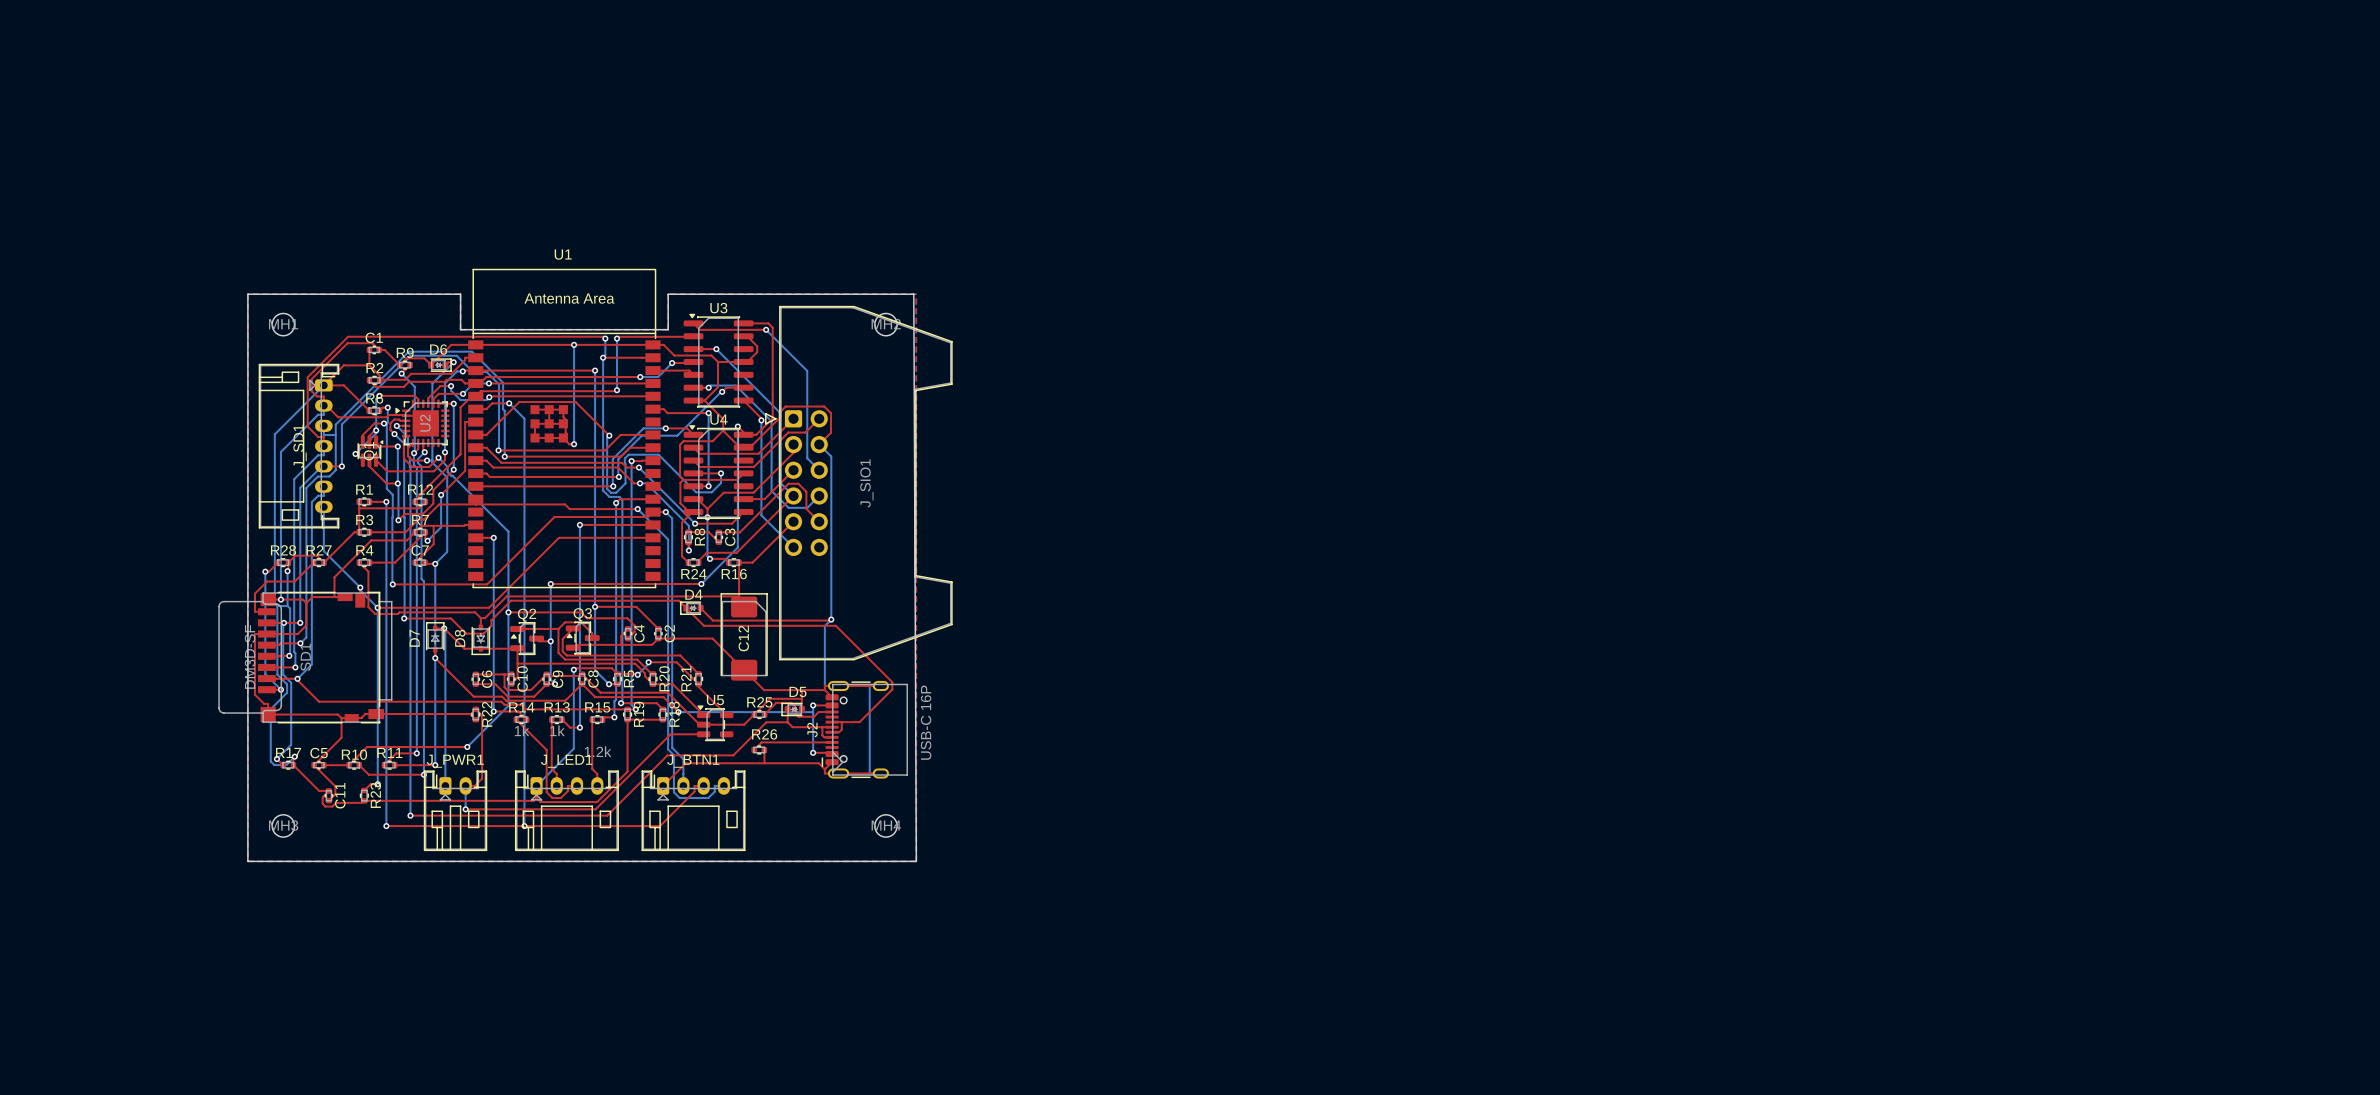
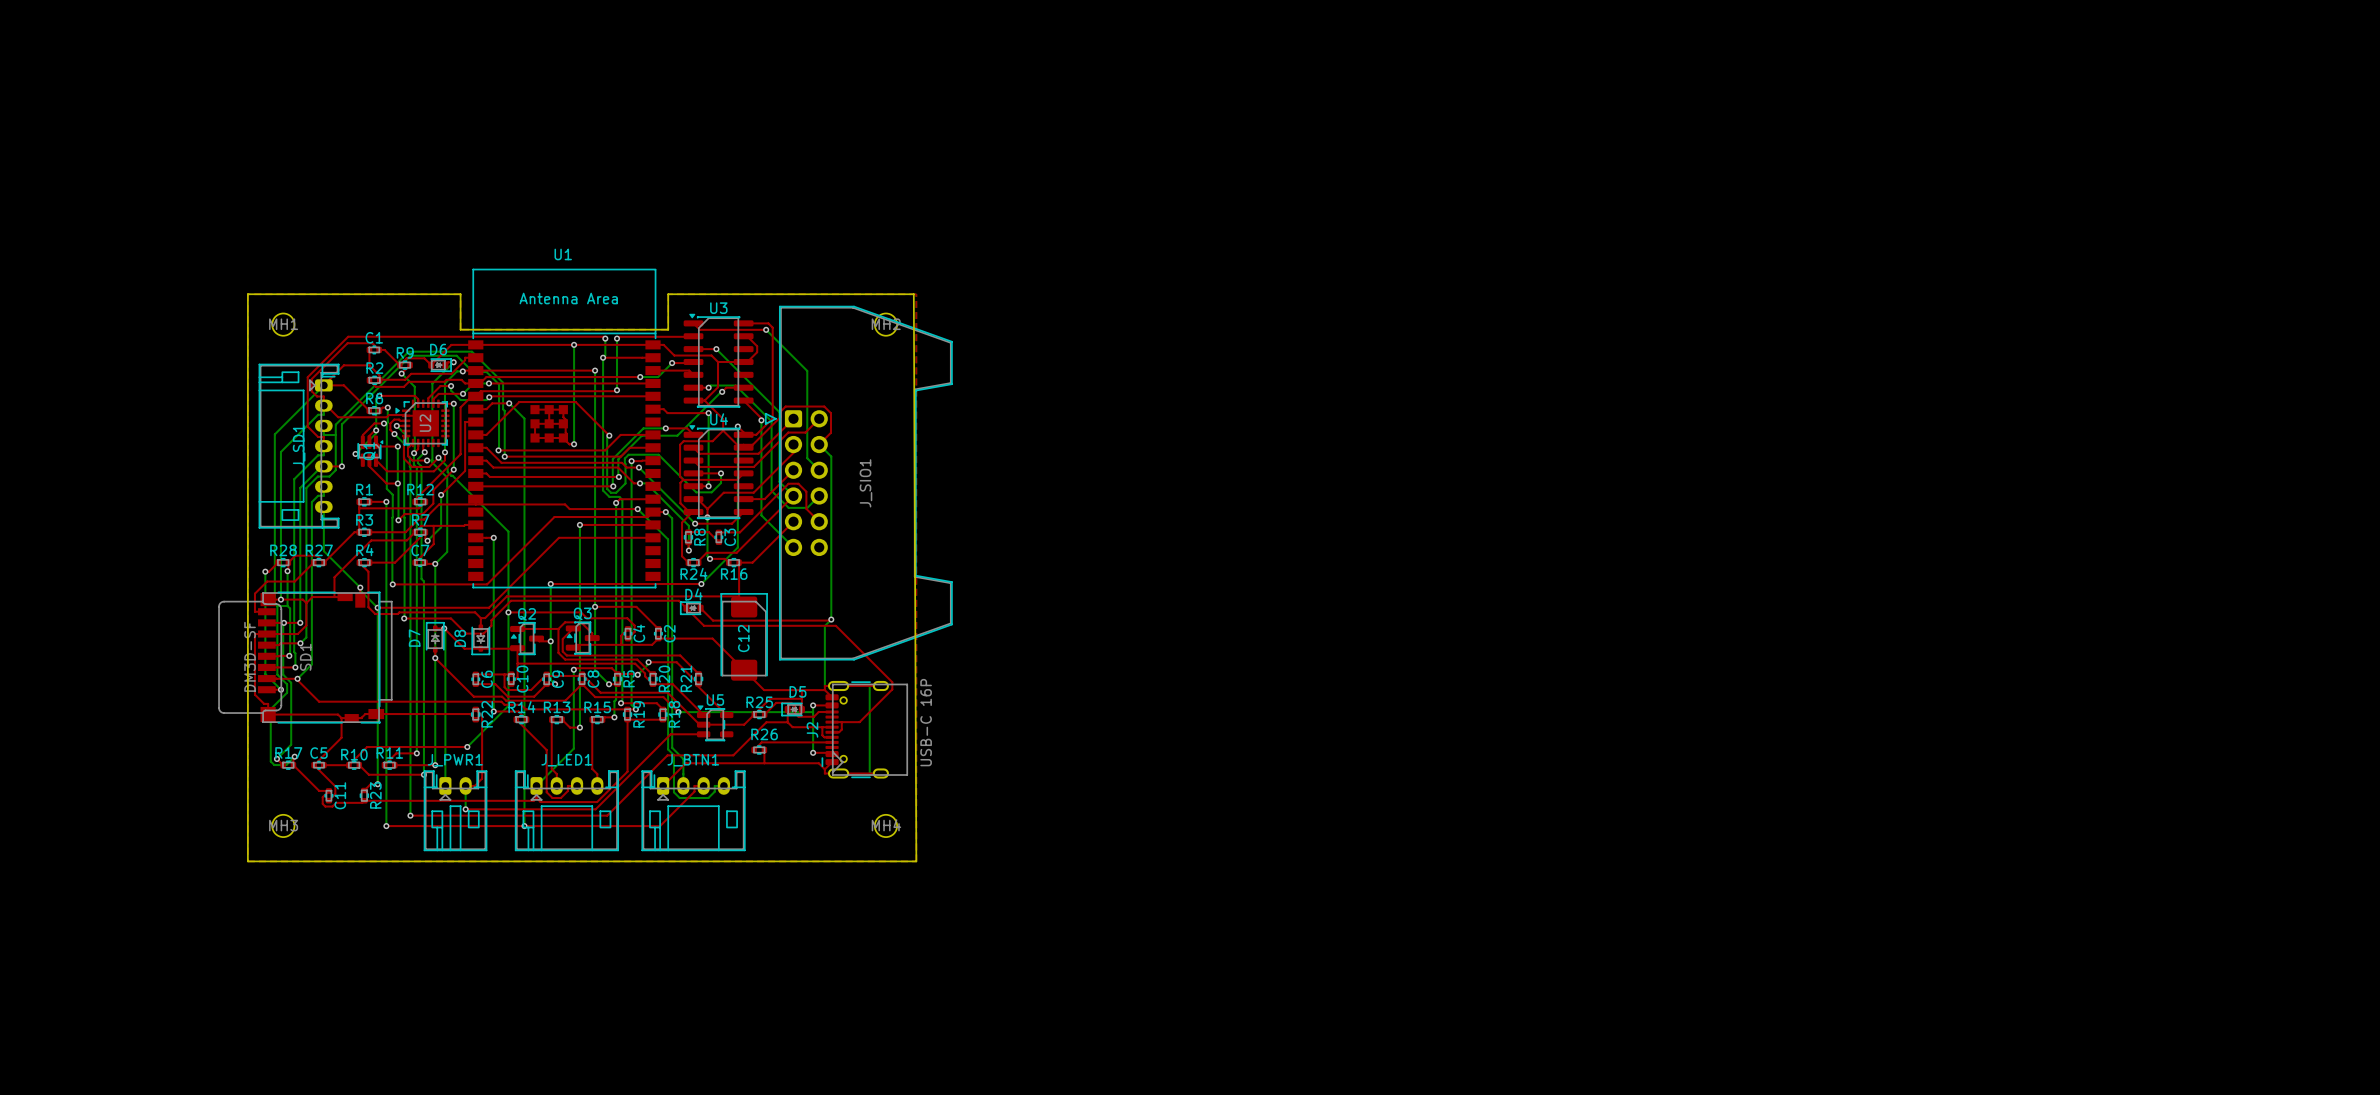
R14 value: 1k (522, 730) -> none
R13 value: 1k (557, 730) -> none
R15 value: 1.2k (597, 751) -> none

